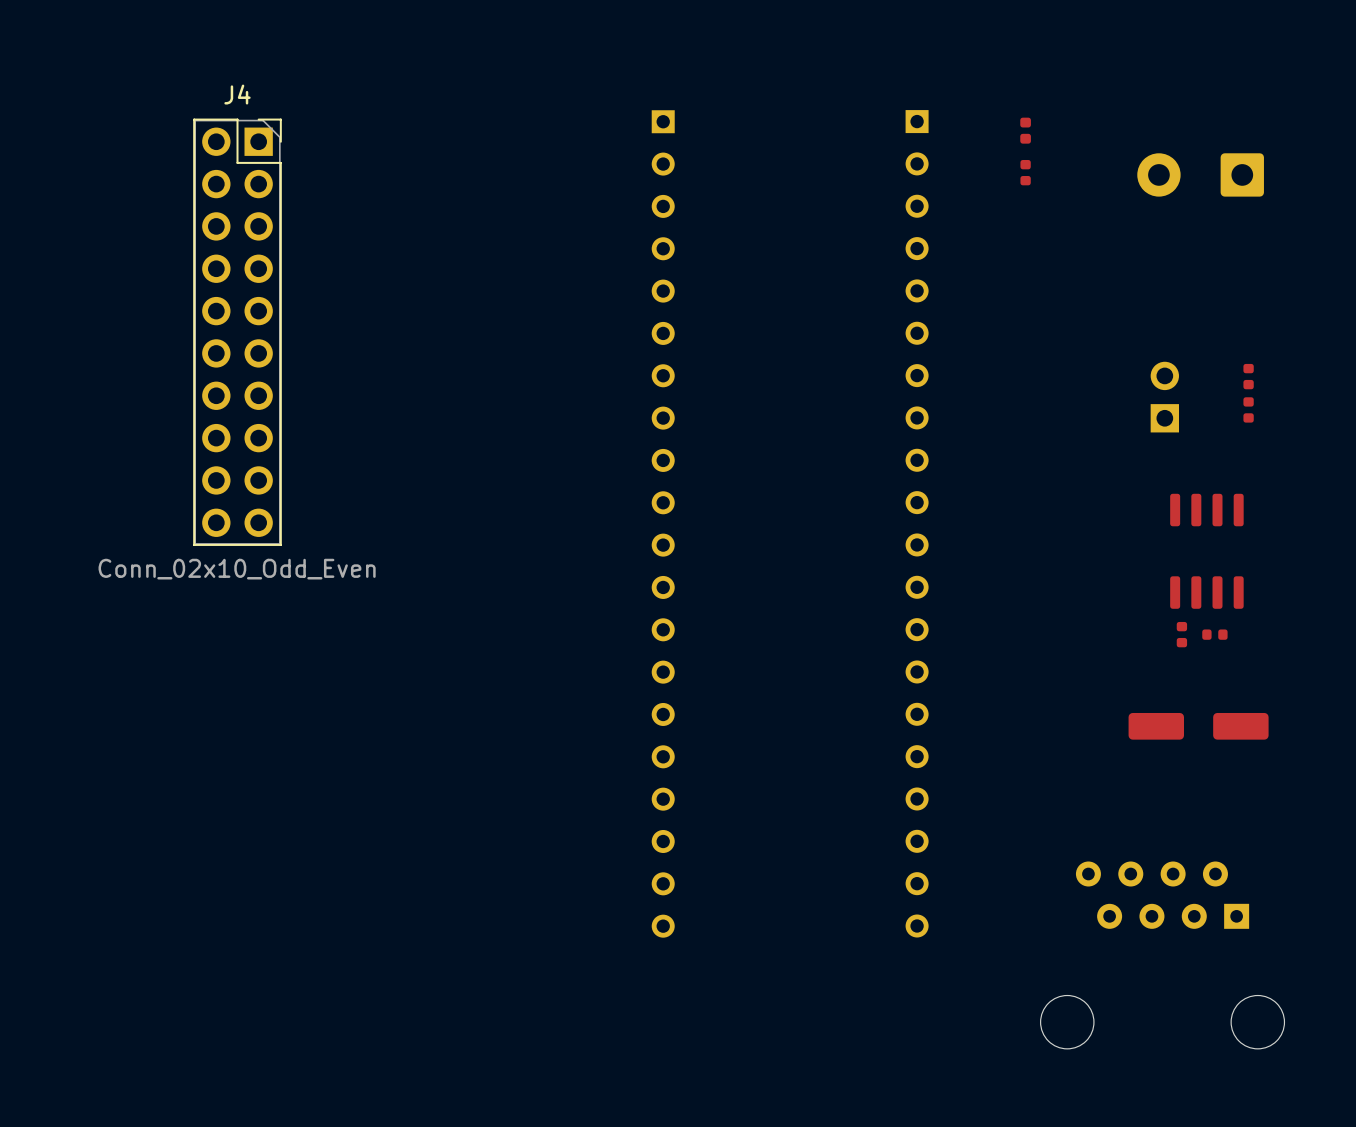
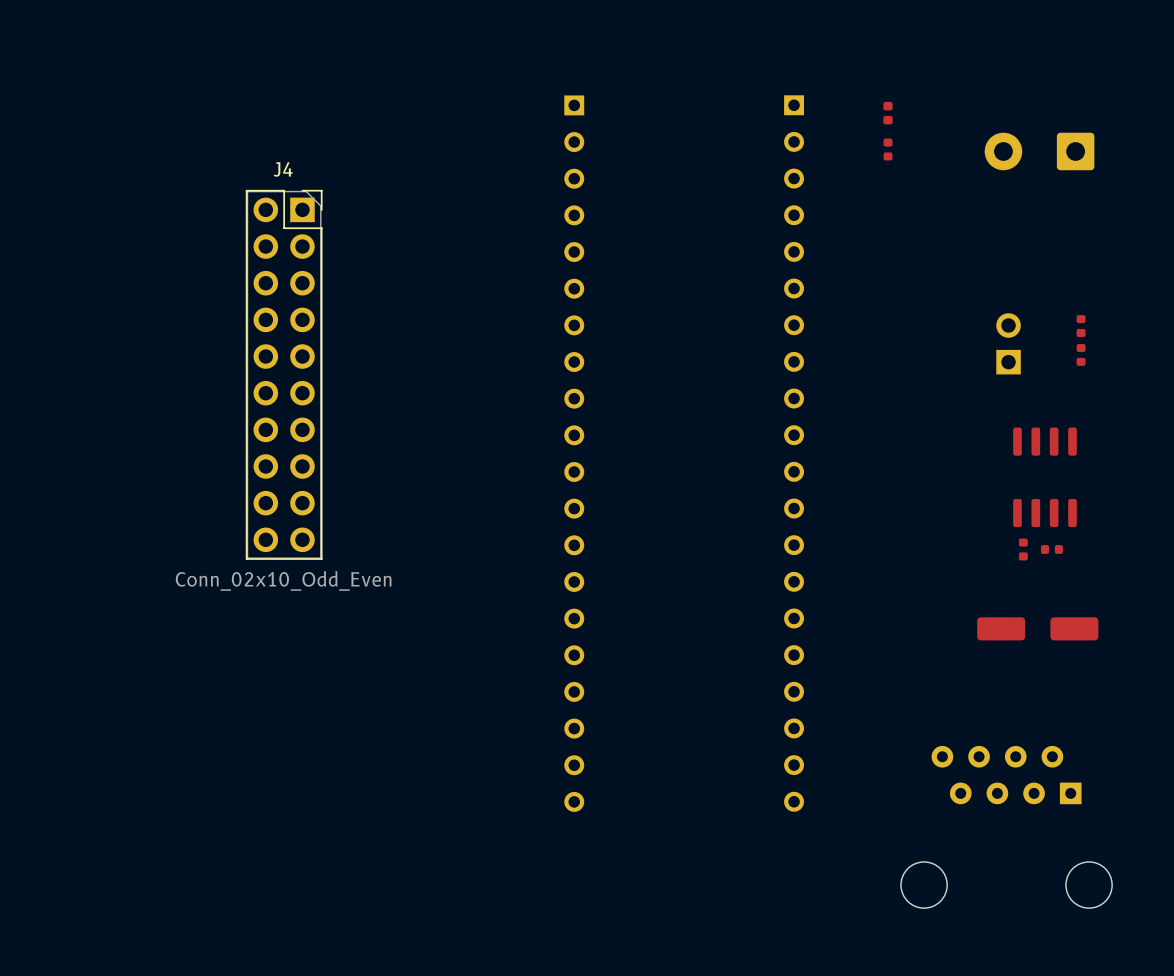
J4 position: (237, 332) -> (284, 374)

